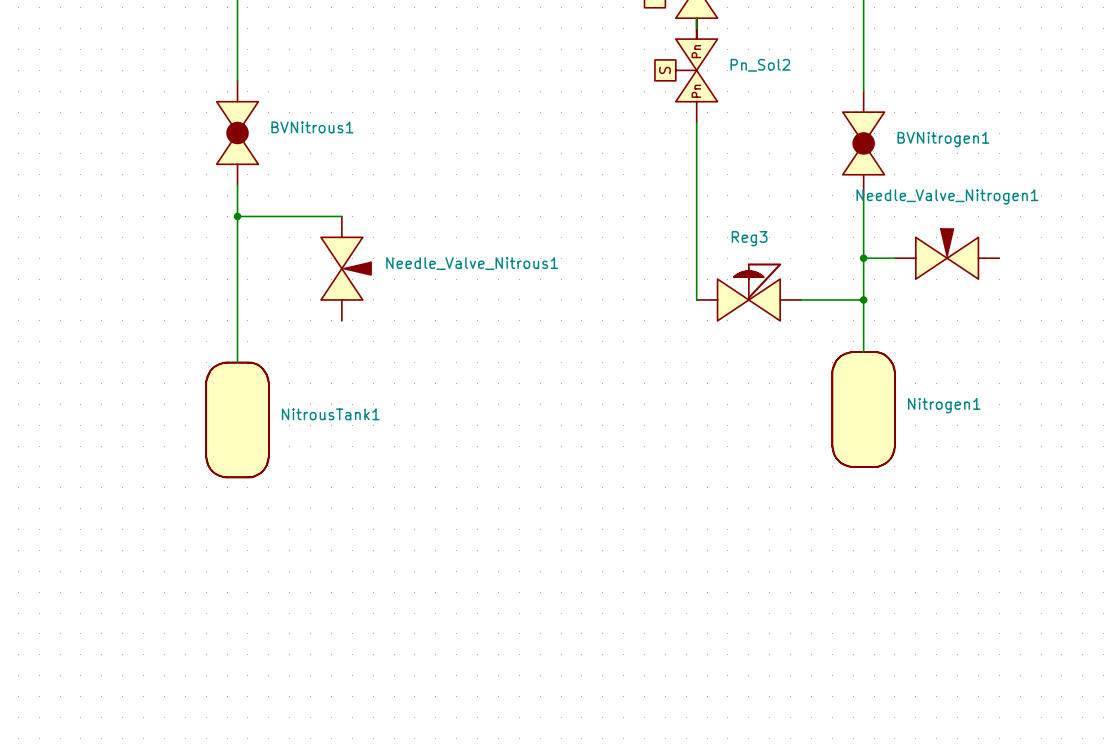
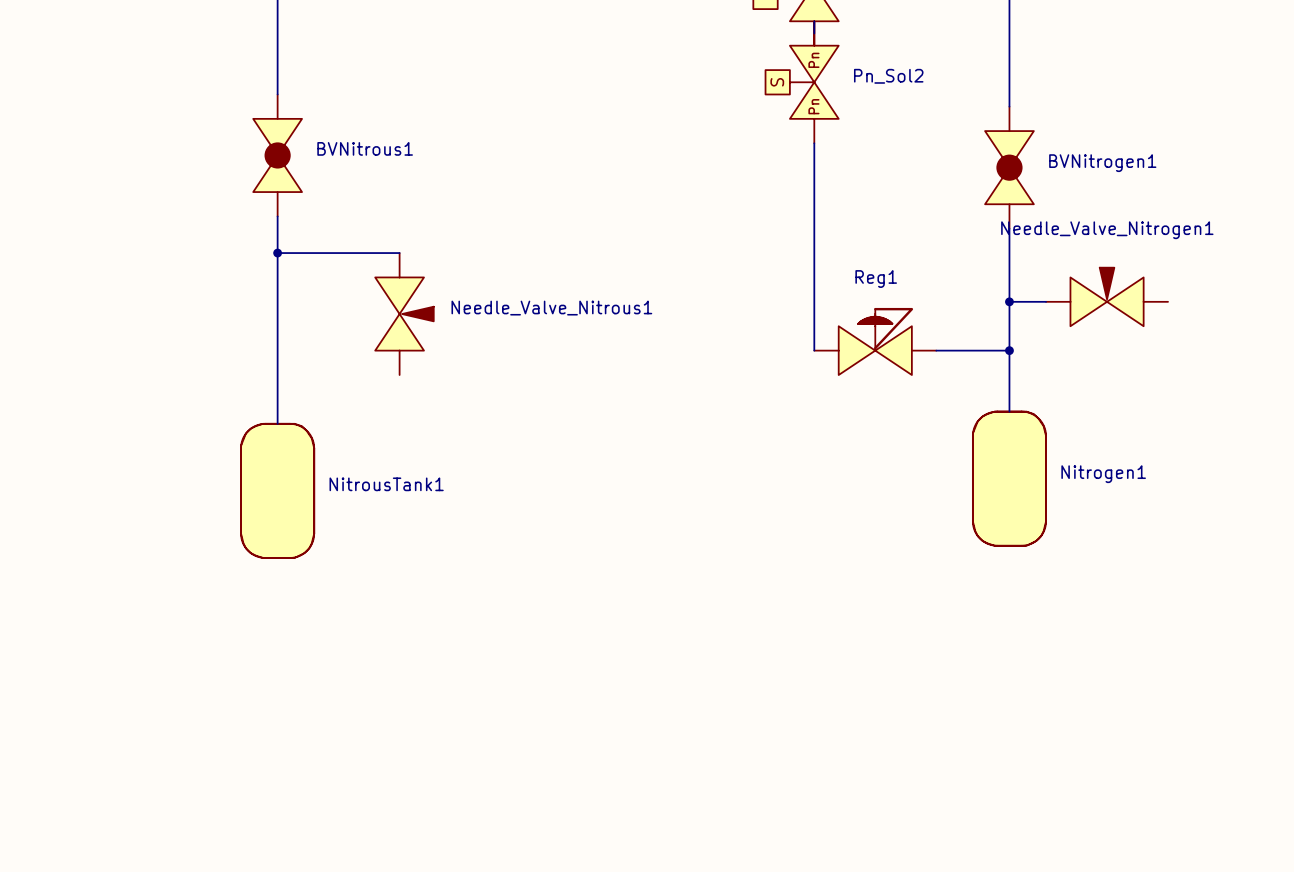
Reg3 name: Reg3 (749, 238) -> Reg1 (876, 279)

